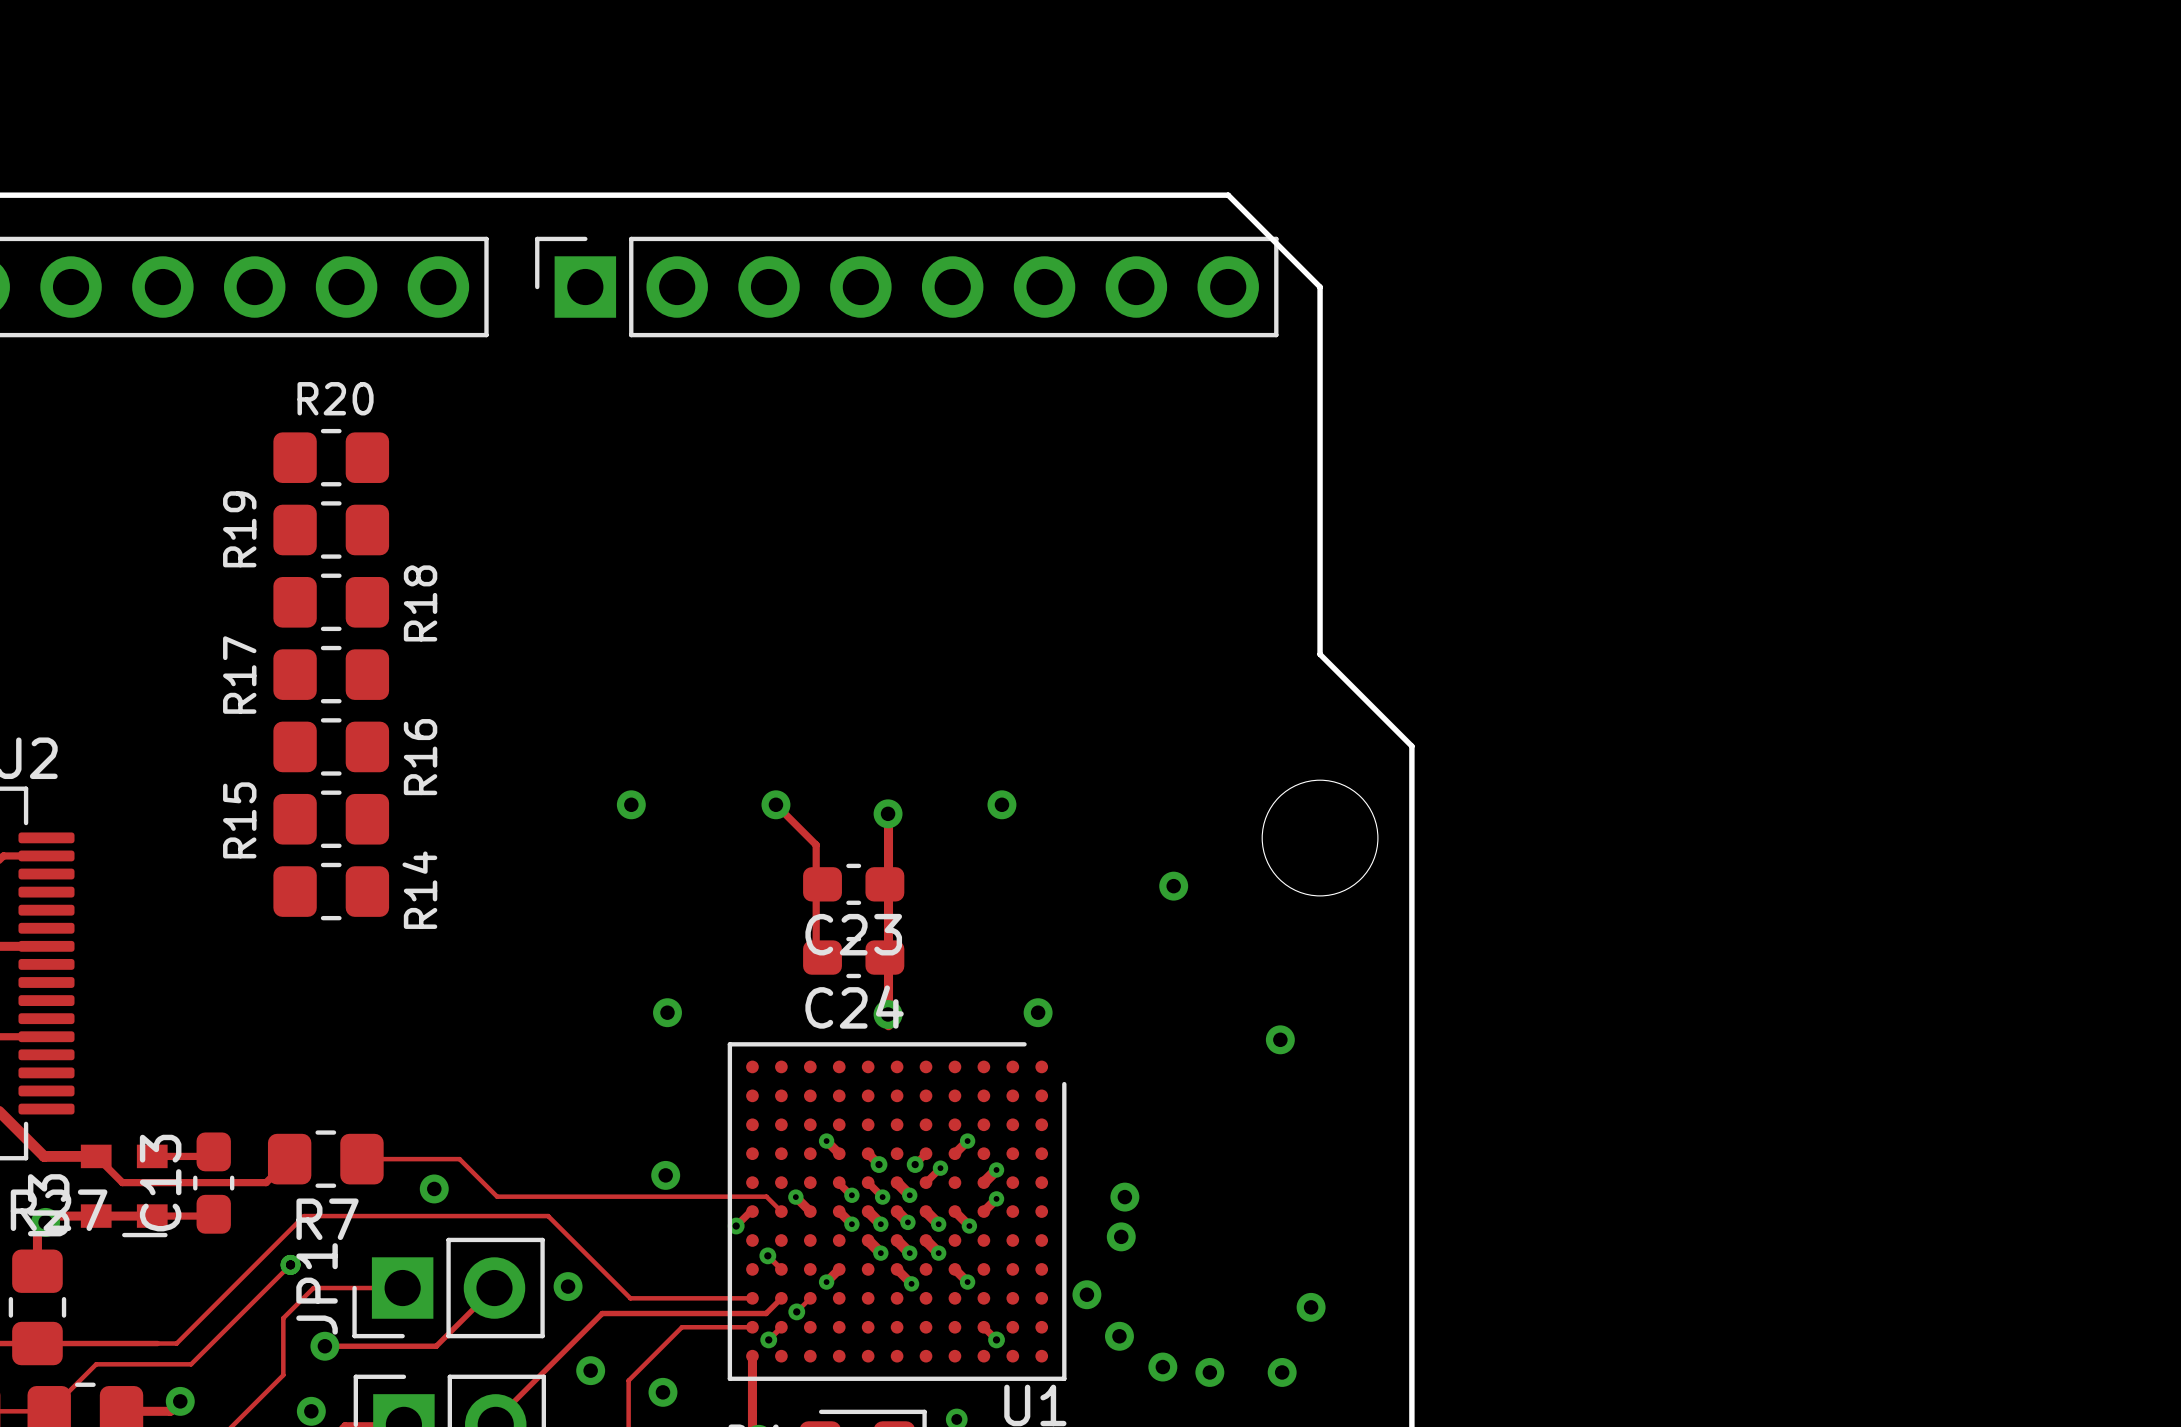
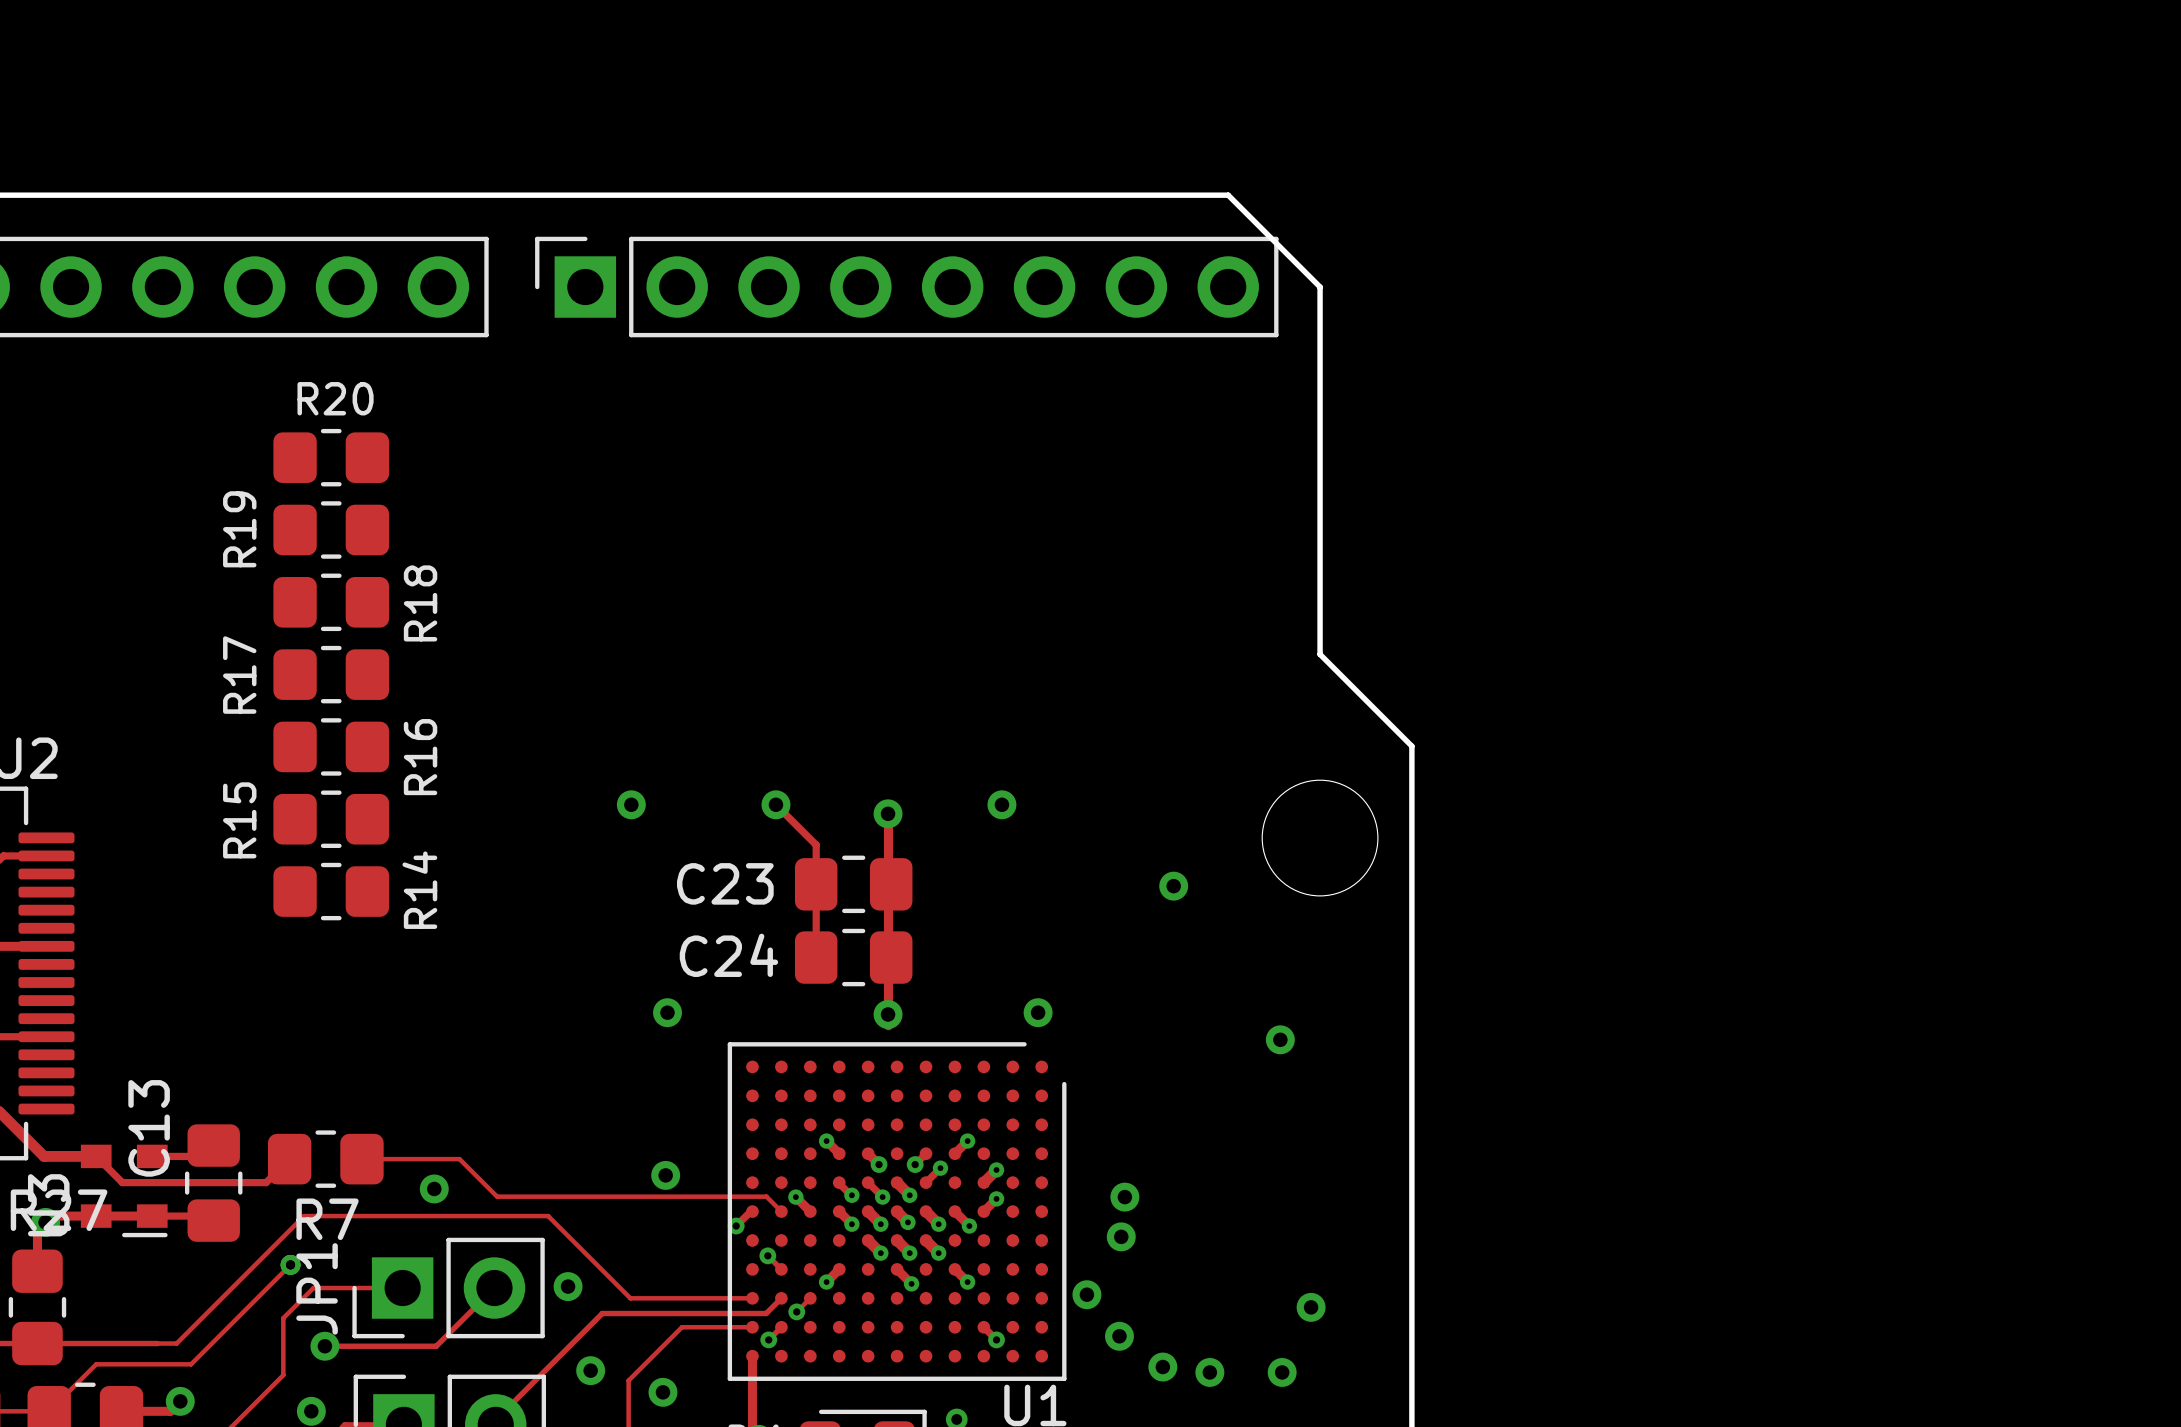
C23 footprint: [803, 863, 905, 905] -> [794, 855, 913, 914]
C23 name position: C23 (853, 934) -> C23 (725, 883)
C24 footprint: [803, 936, 905, 979] -> [794, 928, 913, 987]
C24 name position: C24 (854, 1007) -> C24 (728, 955)
C13 footprint: [193, 1132, 235, 1234] -> [184, 1124, 243, 1242]
C13 name position: C13 (160, 1183) -> C13 (149, 1128)

